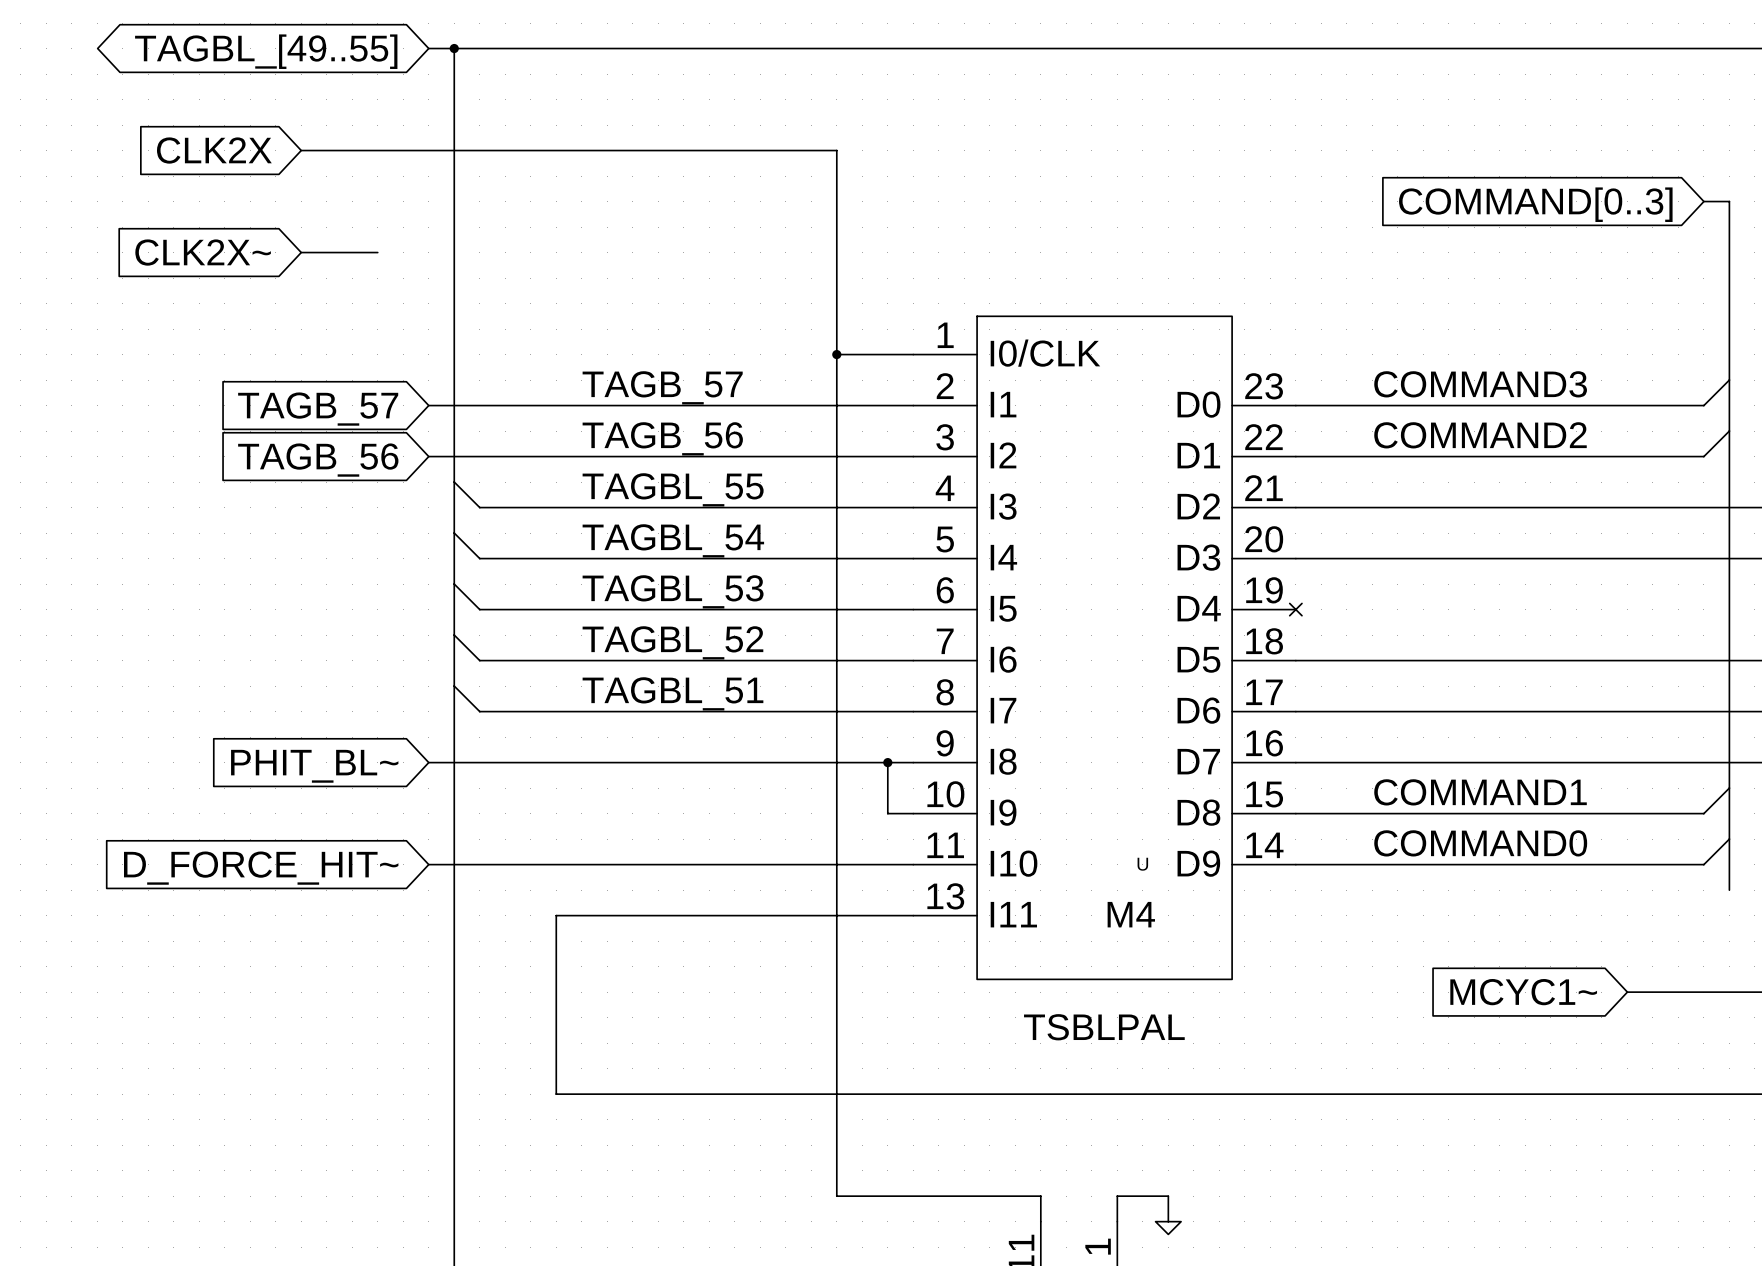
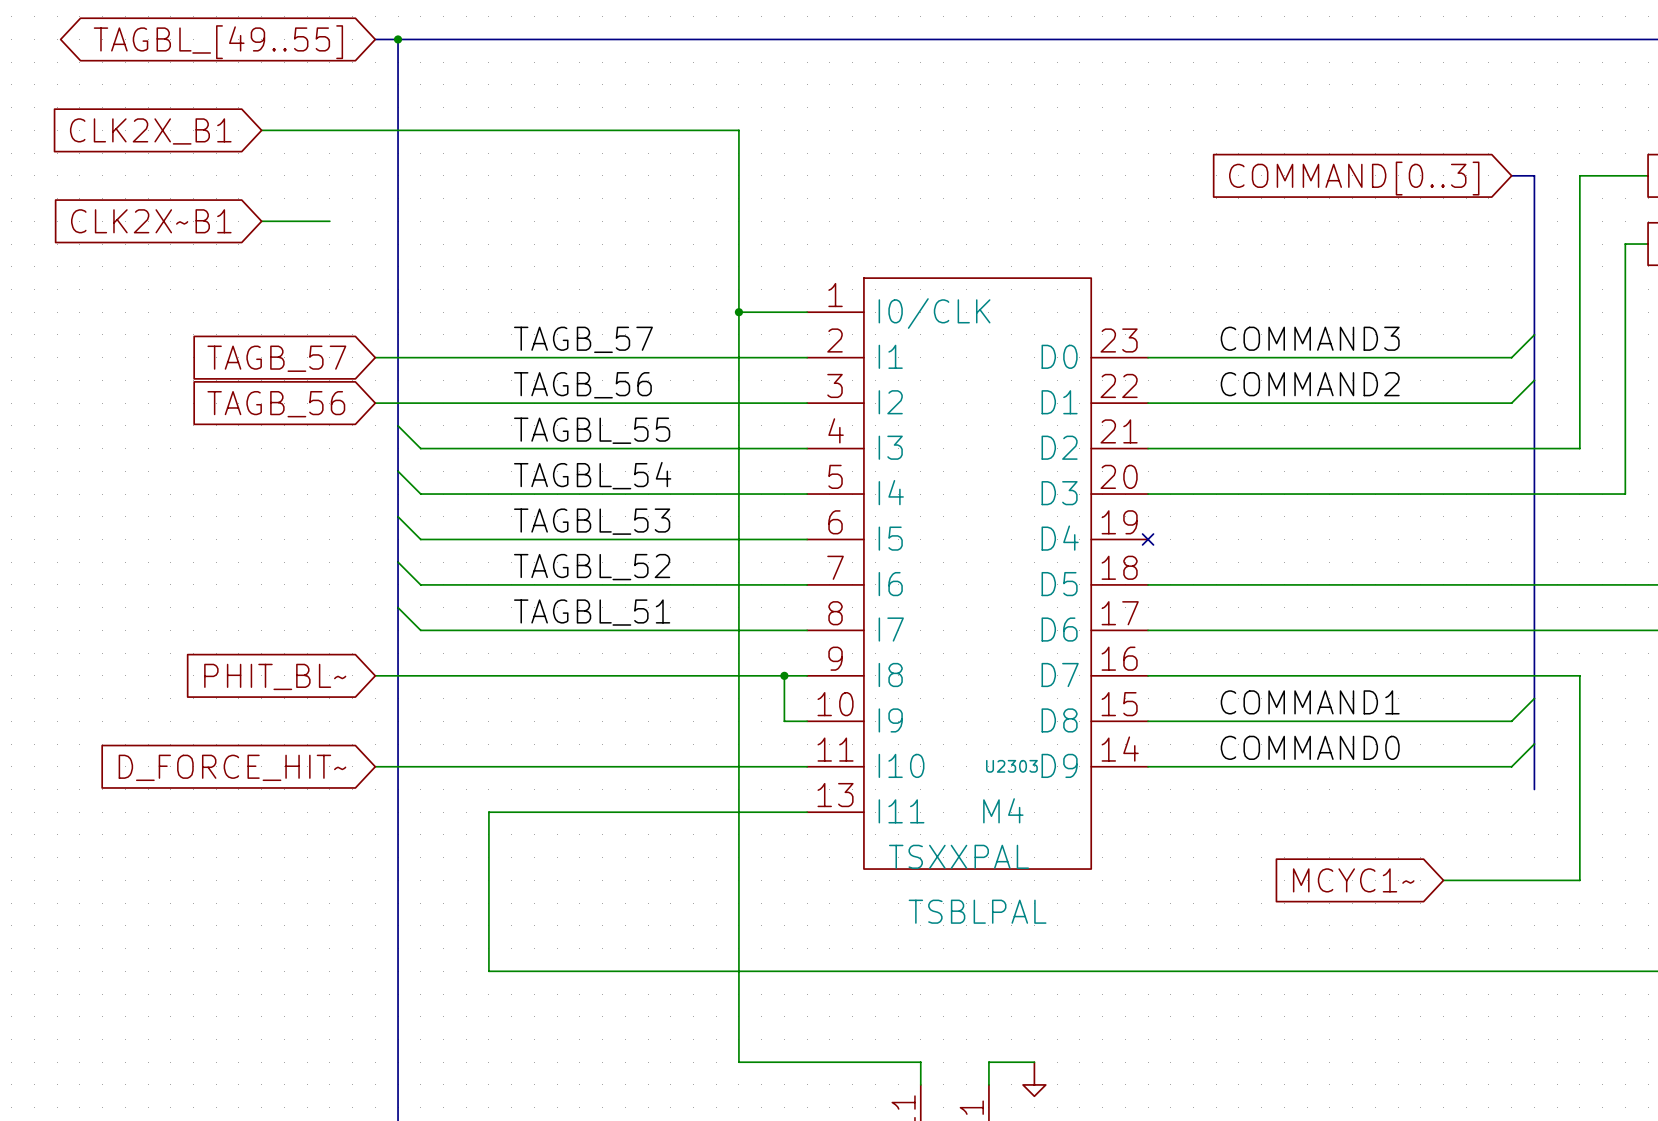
global label: CLK2X (214, 150) -> CLK2X_B1 (150, 131)
global label: CLK2X~ (203, 252) -> CLK2X~B1 (151, 221)
U name: U (1142, 864) -> U2303 (1011, 766)
U value: none -> TSXXPAL (959, 856)

